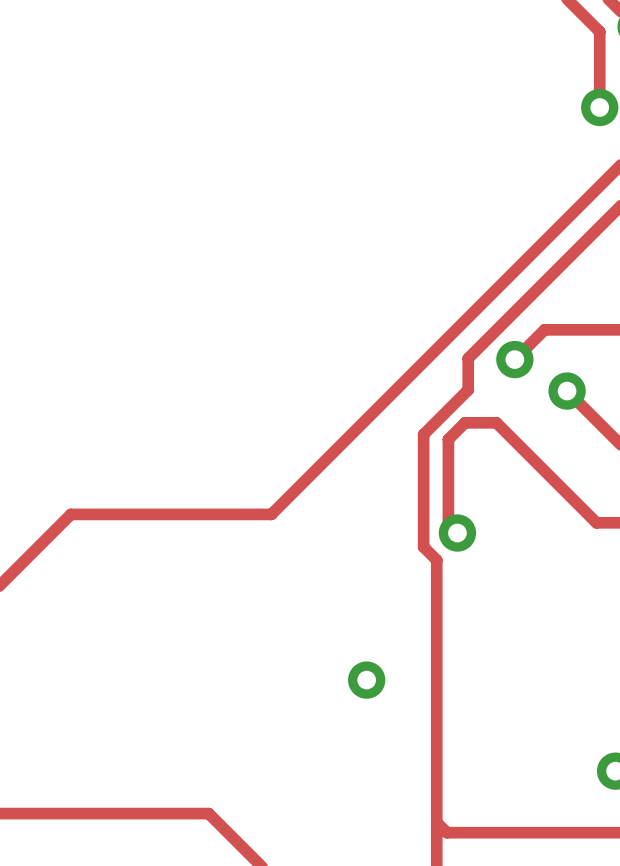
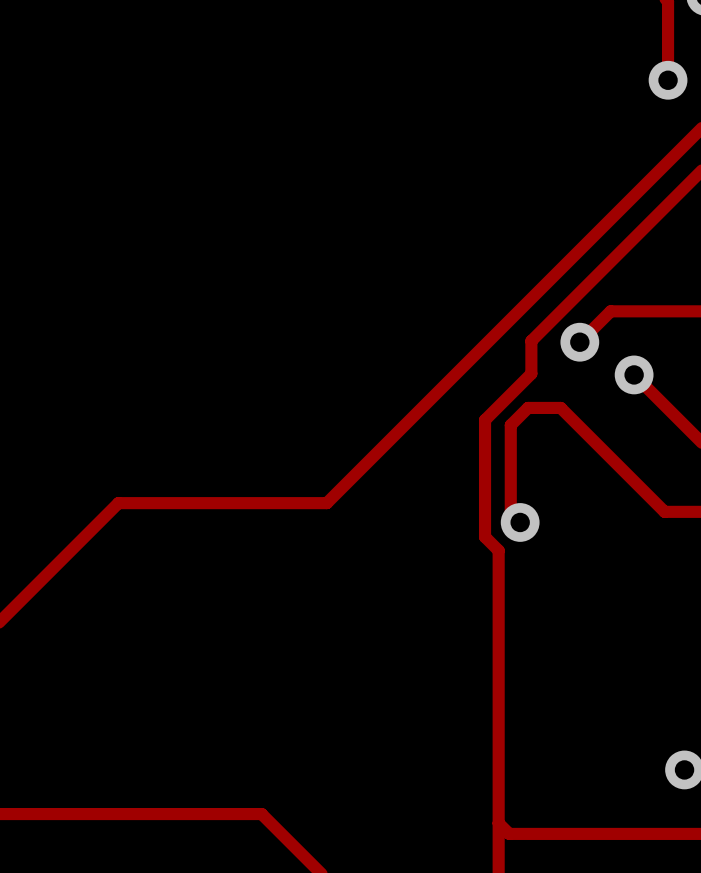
via: (366, 680) -> none

